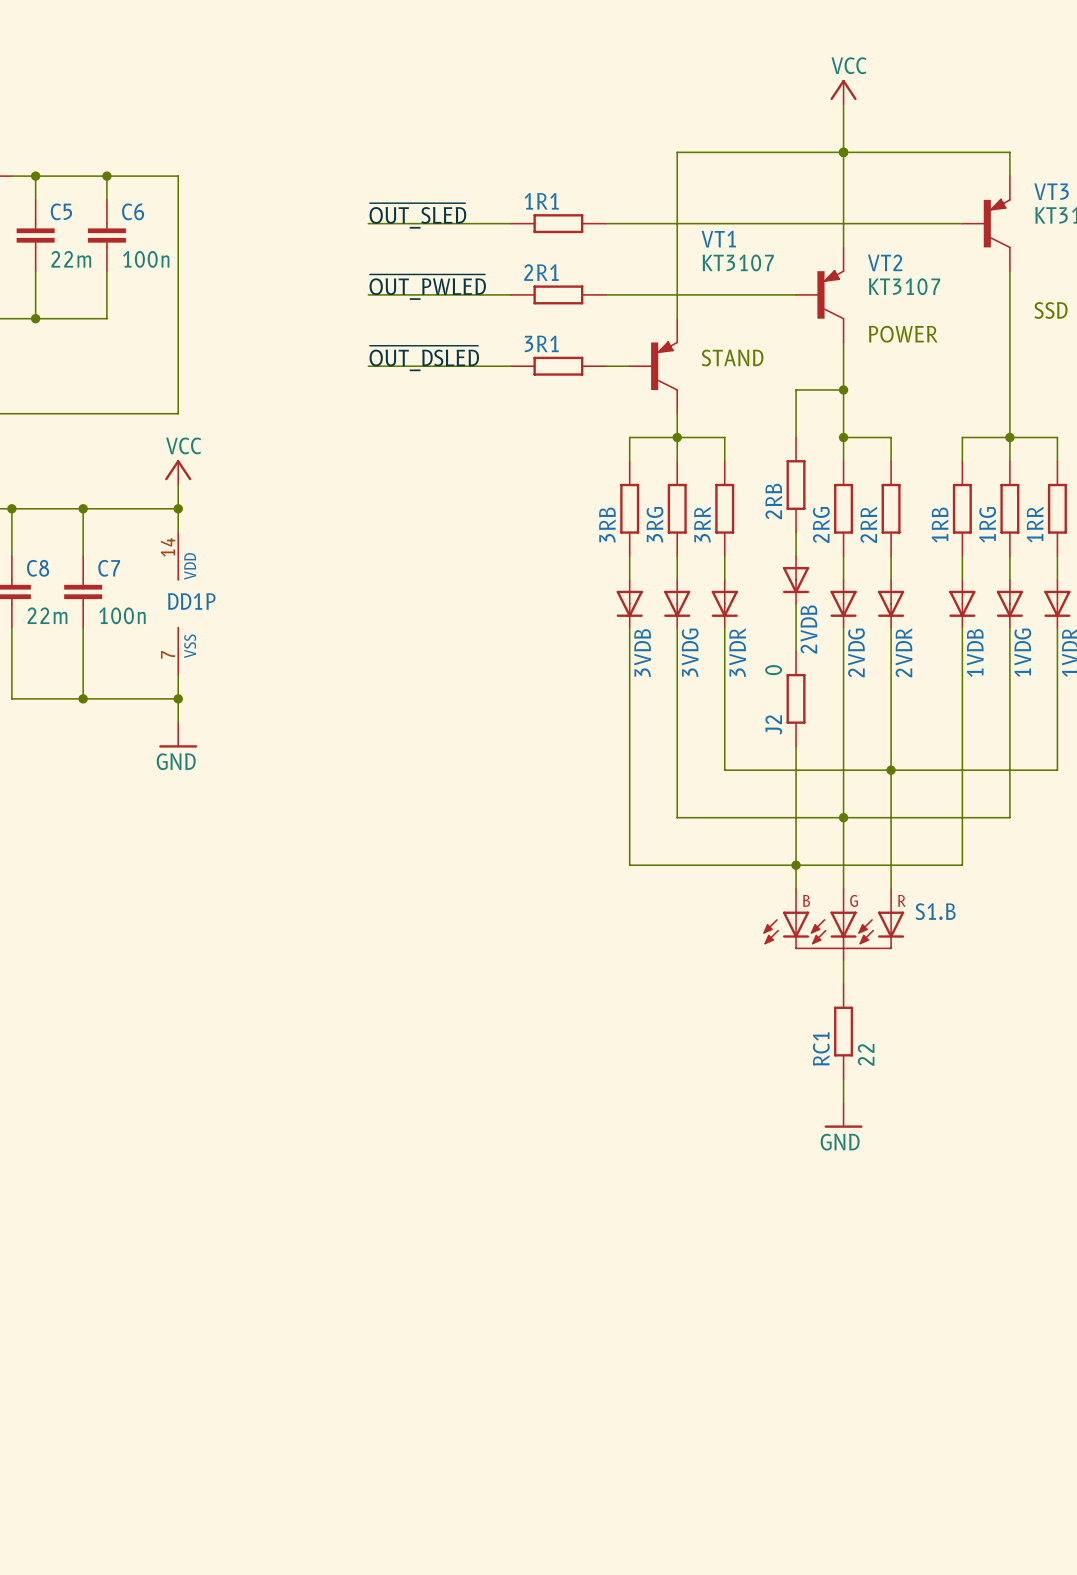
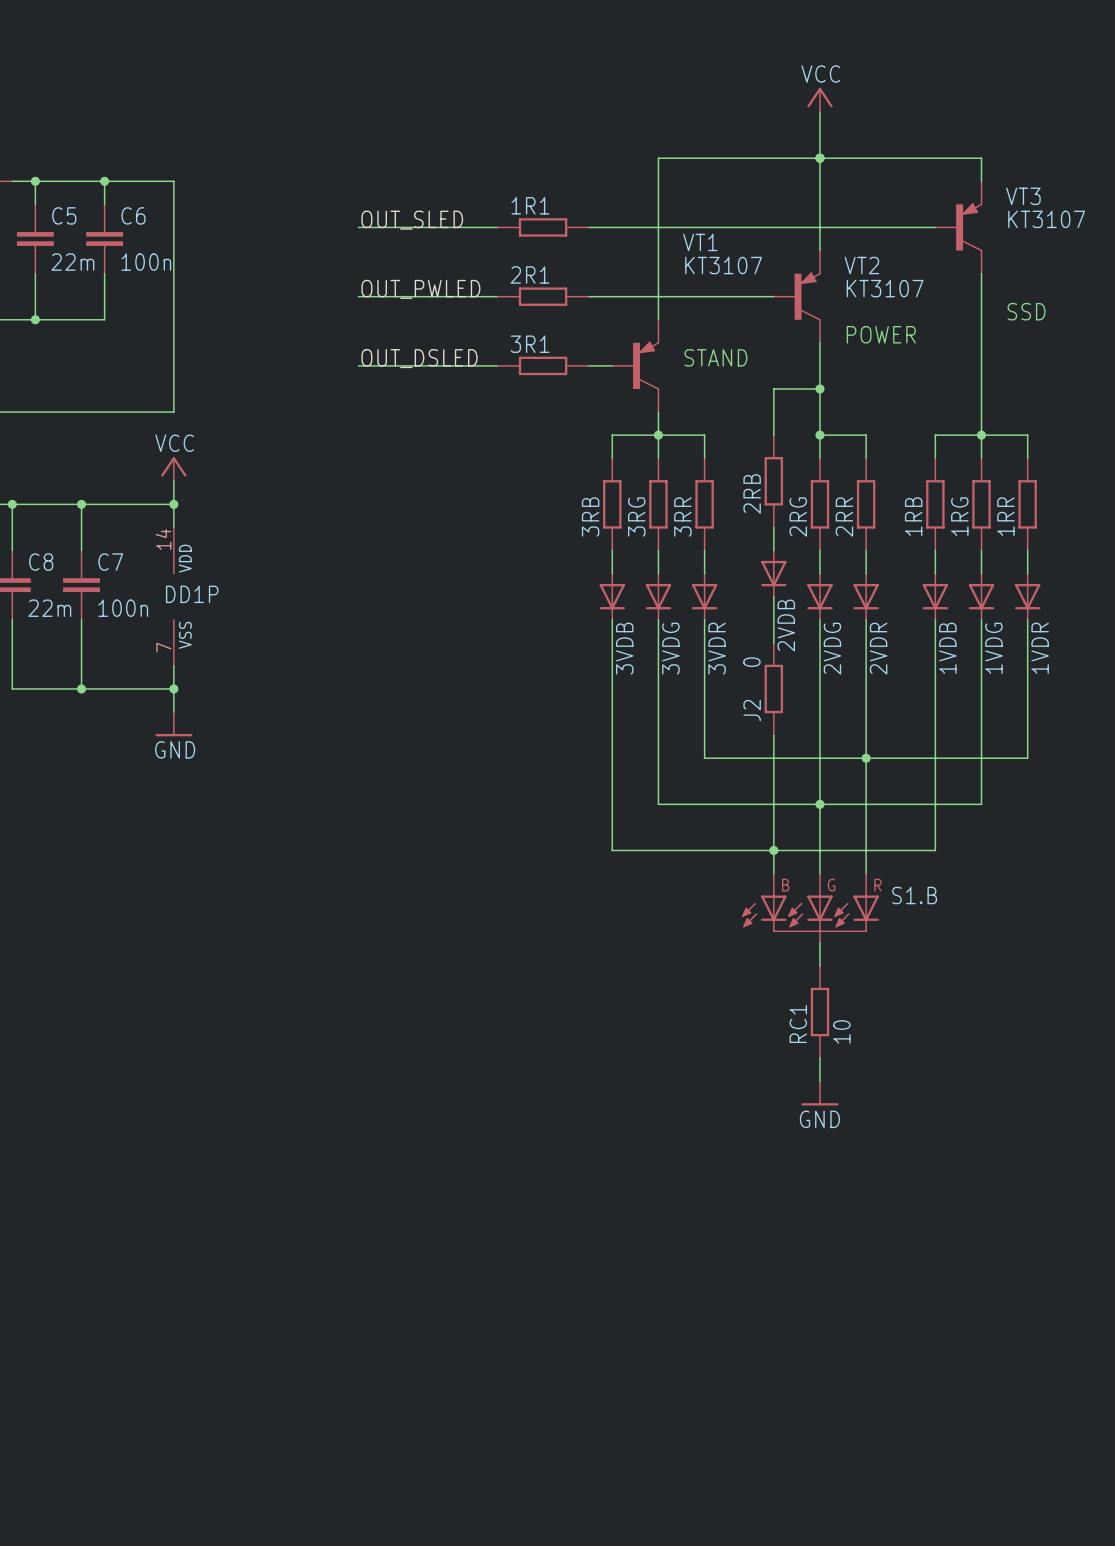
label: ~{OUT_SLED} (417, 215) -> OUT_SLED (412, 220)
label: ~{OUT_PWLED} (427, 287) -> OUT_PWLED (420, 289)
label: ~{OUT_DSLED} (424, 358) -> OUT_DSLED (419, 358)
RC1 value: 22 (866, 1054) -> 10 (841, 1031)

